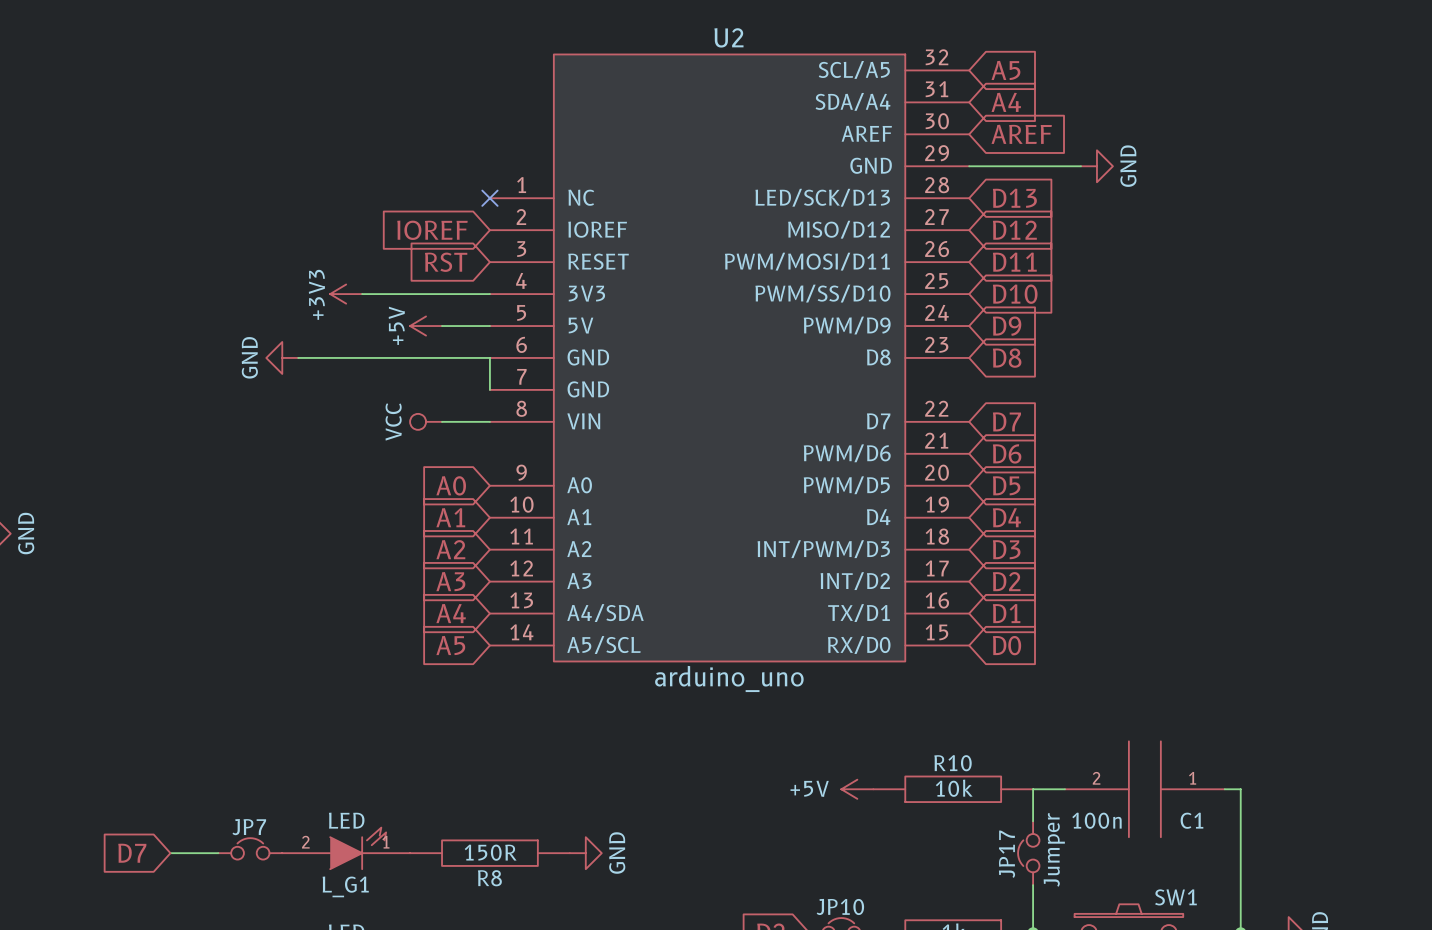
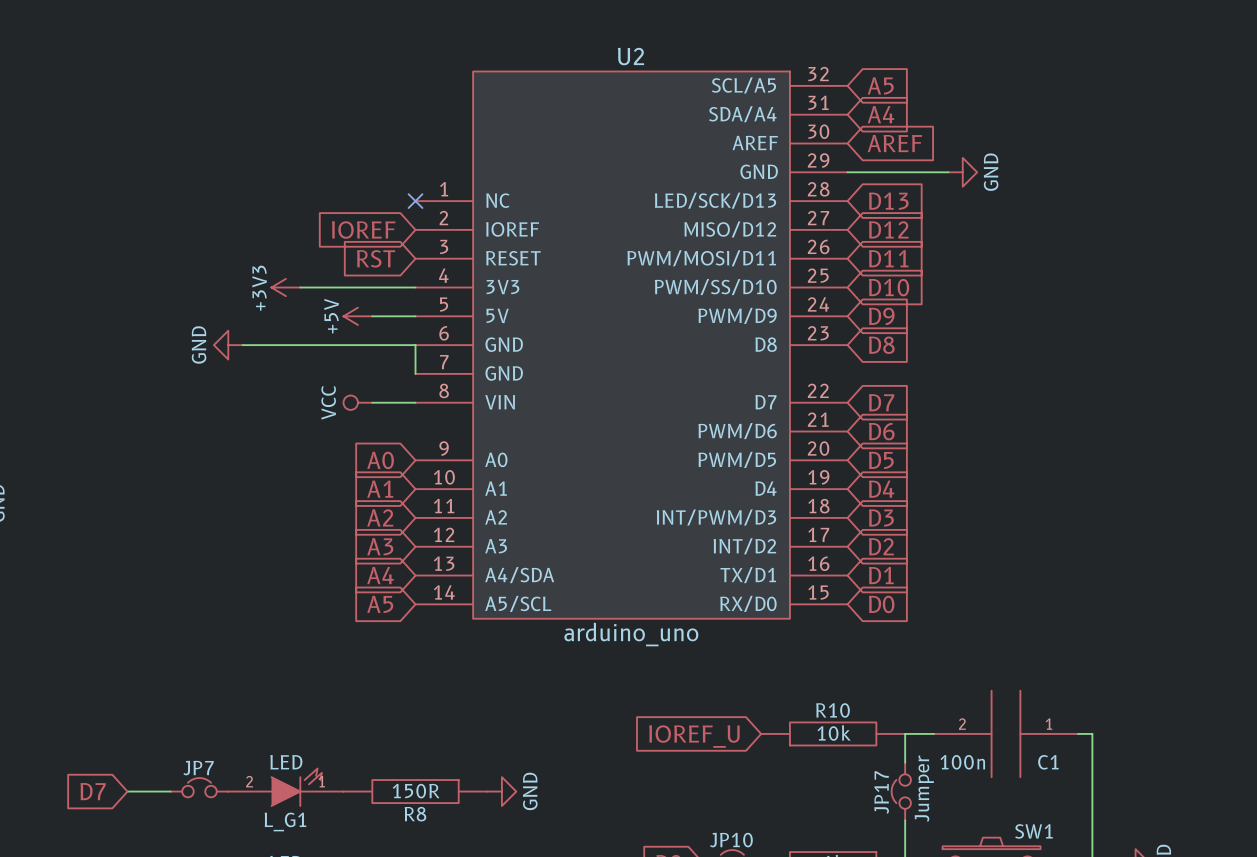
power symbol: +5V (857, 789) -> none
global label: none -> IOREF_U (694, 736)

